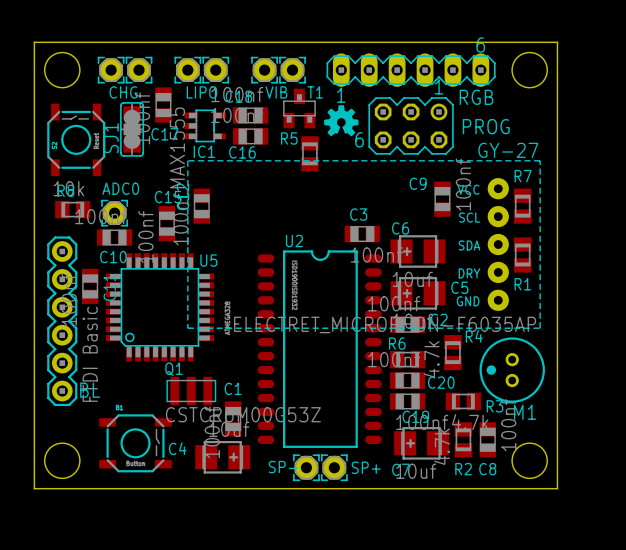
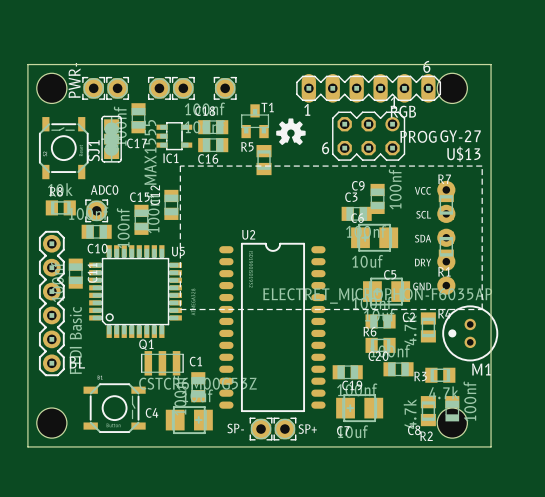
board edge: (557, 42) (557, 488) -> (476, 64) (491, 64) (491, 446) (476, 446)
PWR- name: none -> PWR- (74, 80)
part: (292, 70) -> none
RGB position: (411, 70) -> (368, 88)
text: CHG (123, 92) -> none
text: LIPO (201, 92) -> none
text: VIB (276, 92) -> none
PROG position: (411, 125) -> (368, 136)
C3 position: (362, 234) -> (356, 213)
part: GY-27 (364, 244) -> none
U$13: none -> GY-27 (331, 237)
C6 position: (418, 251) -> (374, 237)
C5 position: (418, 293) -> (386, 291)
C2 position: (407, 324) -> (380, 321)
R4 position: (452, 352) -> (428, 327)
R6 position: (407, 359) -> (380, 345)
M1 position: (512, 370) -> (470, 333)
C20 position: (407, 380) -> (398, 369)
R3 position: (463, 401) -> (440, 375)
R2 position: (463, 439) -> (428, 411)
C8 position: (487, 439) -> (452, 411)

